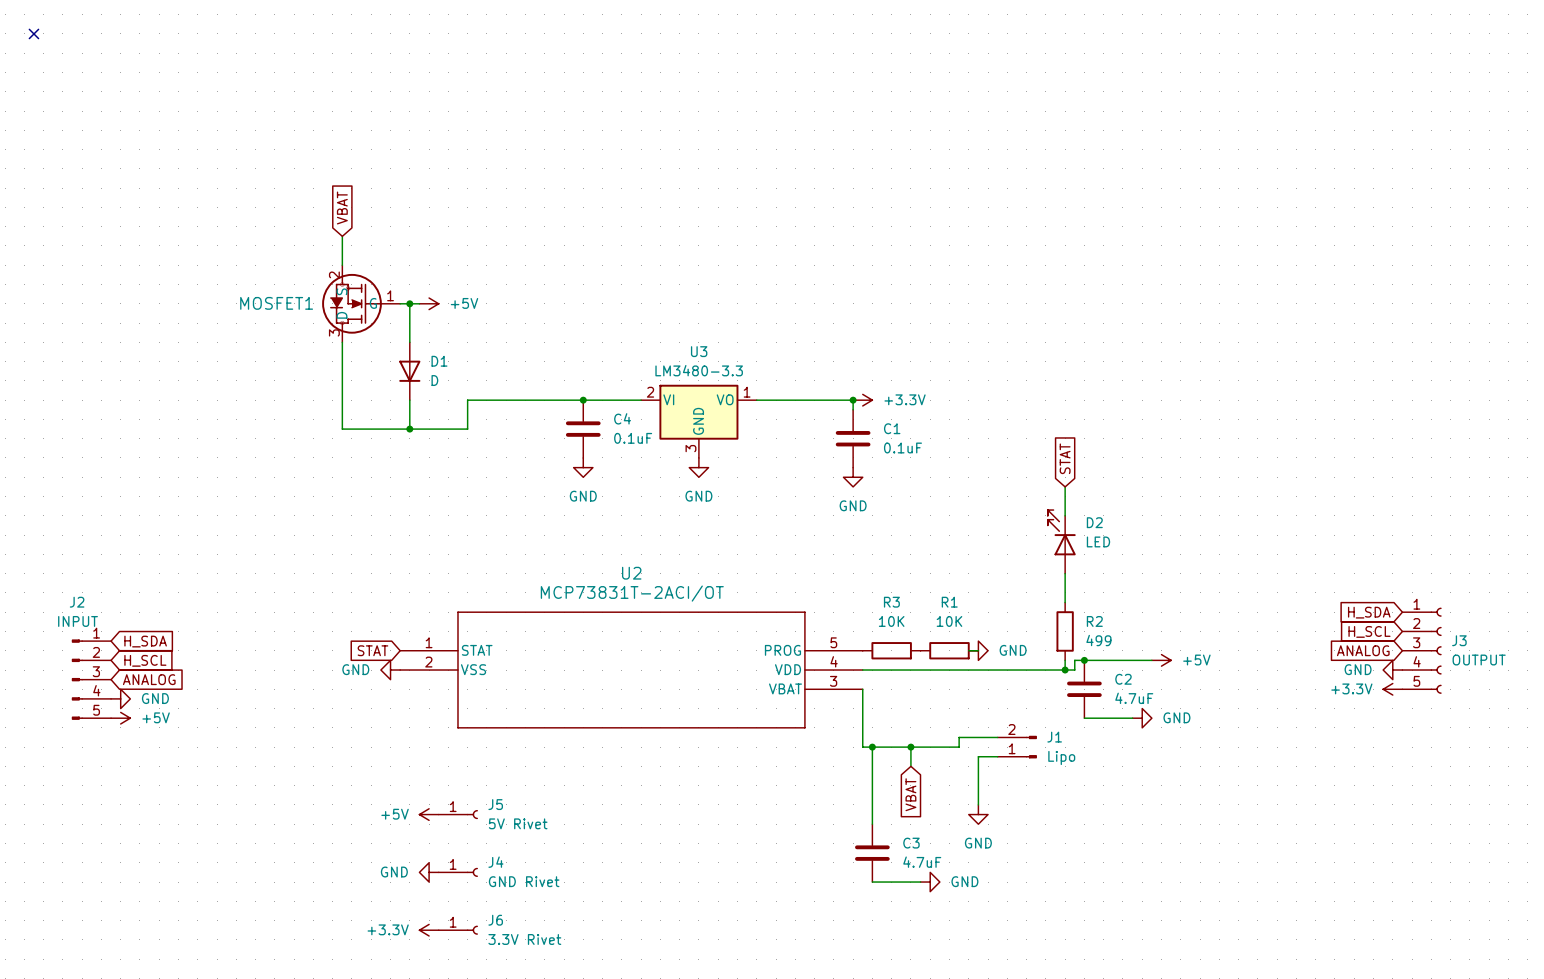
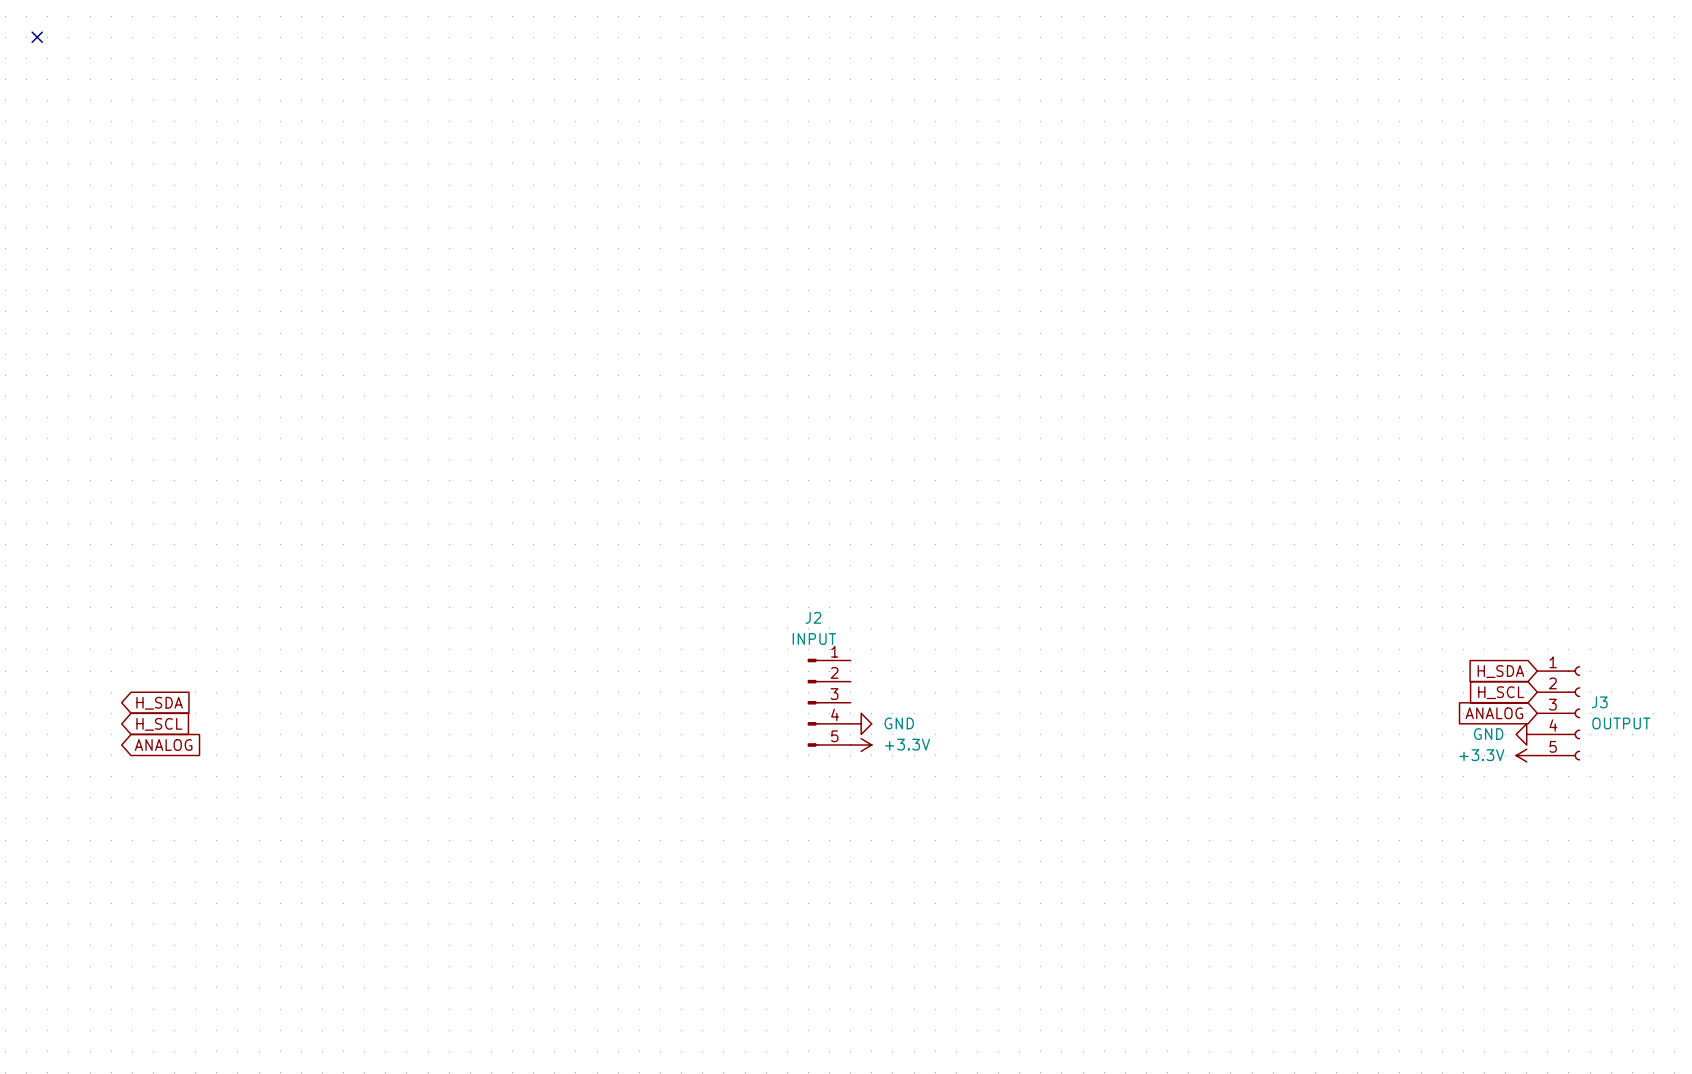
global label: VBAT (342, 207) -> none
wire: (342, 236) (342, 265) -> none
MOSFET1: (361, 303) -> none
wire: (400, 303) (419, 303) -> none
wire: (409, 303) (409, 342) -> none
junction: (409, 303) -> none
power symbol: +5V (429, 303) -> none
wire: (342, 342) (342, 429) (467, 429) (467, 400) (641, 400) -> none
D1: D (409, 371) -> none
wire: (409, 400) (409, 429) -> none
junction: (583, 400) -> none
wire: (756, 400) (853, 400) (853, 409) -> none
junction: (853, 400) -> none
power symbol: +3.3V (862, 400) -> none
U3: LM3480-3.3 (698, 421) -> none
junction: (409, 429) -> none
C4: 0.1uF (583, 429) -> none
C1: 0.1uF (853, 438) -> none
global label: STAT (1065, 458) -> none
power symbol: GND (583, 467) -> none
power symbol: GND (698, 467) -> none
power symbol: GND (853, 477) -> none
wire: (1065, 486) (1065, 515) -> none
D2: LED (1061, 541) -> none
wire: (1065, 573) (1065, 602) -> none
R2: 499 (1065, 631) -> none
global label: STAT (372, 650) -> none
R3: 10K (891, 650) -> none
R1: 10K (949, 650) -> none
wire: (968, 650) (978, 650) -> none
power symbol: GND (978, 650) -> none
power symbol: none -> GND (861, 723)
wire: (1065, 660) (1065, 670) -> none
junction: (1084, 660) -> none
wire: (1151, 660) (1074, 660) (1074, 670) (862, 670) -> none
power symbol: +5V (1161, 660) -> none
power symbol: GND (390, 670) -> none
U2: MCP73831T-2ACI/OT (631, 670) -> none
junction: (1065, 670) -> none
J2 position: (91, 679) -> (829, 702)
power symbol: none -> +3.3V (861, 745)
wire: (862, 689) (862, 747) (959, 747) (959, 737) (997, 737) -> none
C2: 4.7uF (1084, 689) -> none
power symbol: GND (120, 698) -> none
power symbol: +5V (120, 718) -> none
wire: (1084, 718) (1132, 718) -> none
power symbol: GND (1142, 718) -> none
wire: (872, 747) (872, 824) -> none
junction: (872, 747) -> none
wire: (910, 747) (910, 766) -> none
junction: (910, 747) -> none
J1: Lipo (1017, 747) -> none
wire: (997, 756) (978, 756) (978, 804) -> none
global label: VBAT (910, 794) -> none
power symbol: +5V (429, 814) -> none
J5: 5V Rivet (458, 814) -> none
power symbol: GND (978, 814) -> none
C3: 4.7uF (872, 853) -> none
power symbol: GND (429, 872) -> none
J4: GND Rivet (458, 872) -> none
wire: (872, 882) (920, 882) -> none
power symbol: GND (930, 882) -> none
power symbol: +3.3V (429, 930) -> none
J6: 3.3V Rivet (458, 930) -> none

